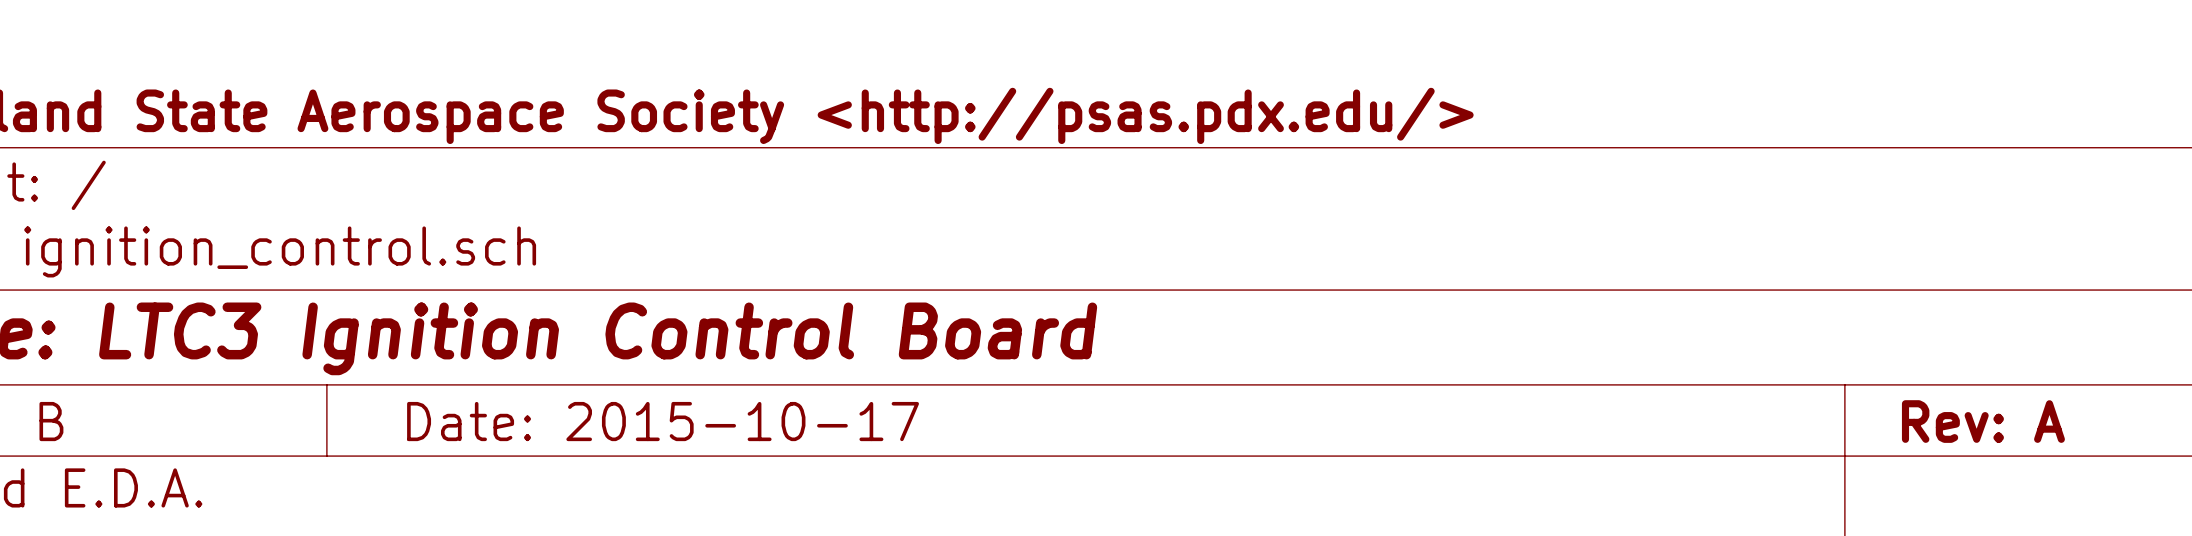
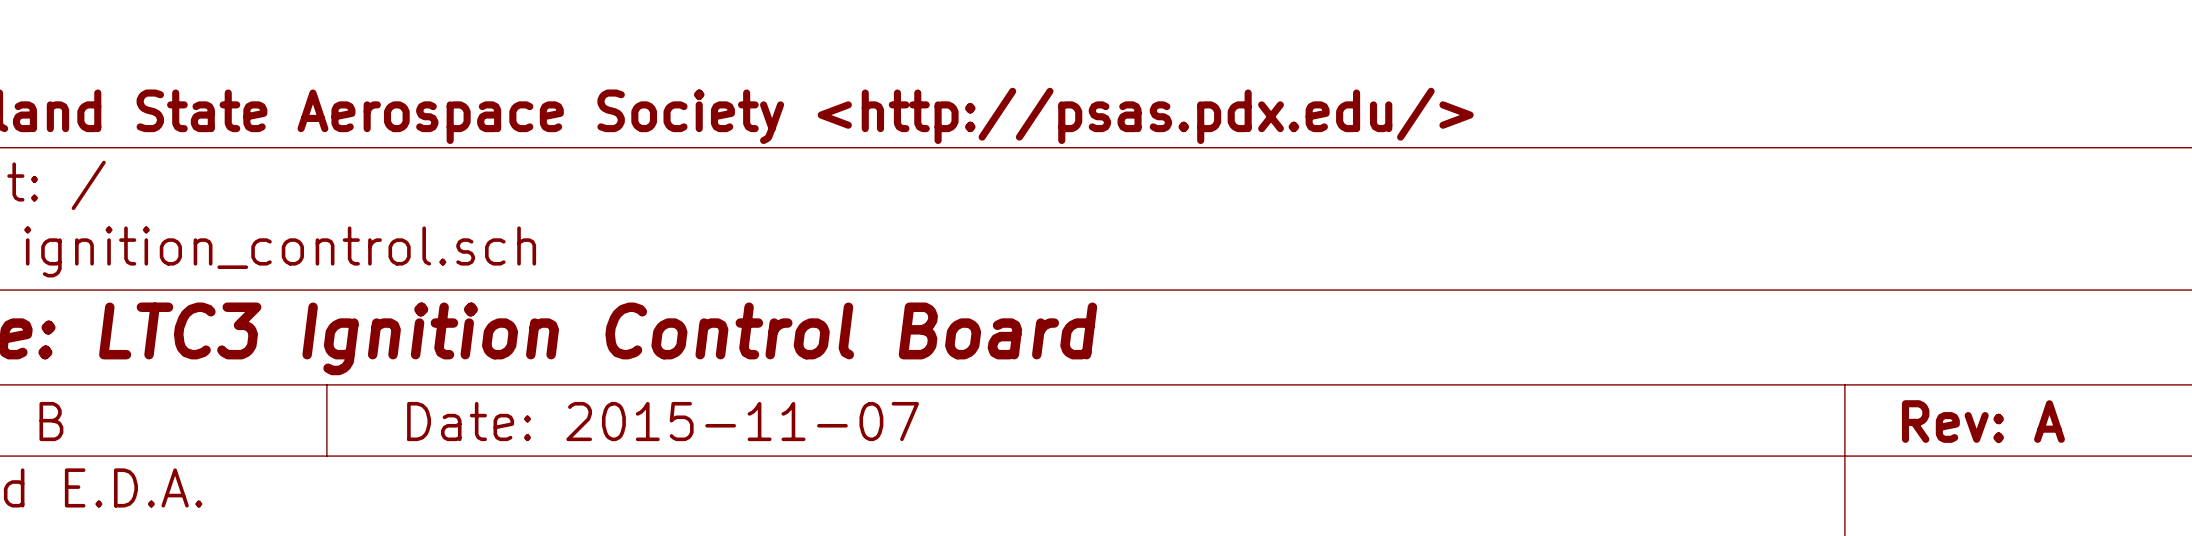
title block: Date: 2015-10-17 (663, 421) -> Date: 2015-11-07 (663, 421)

